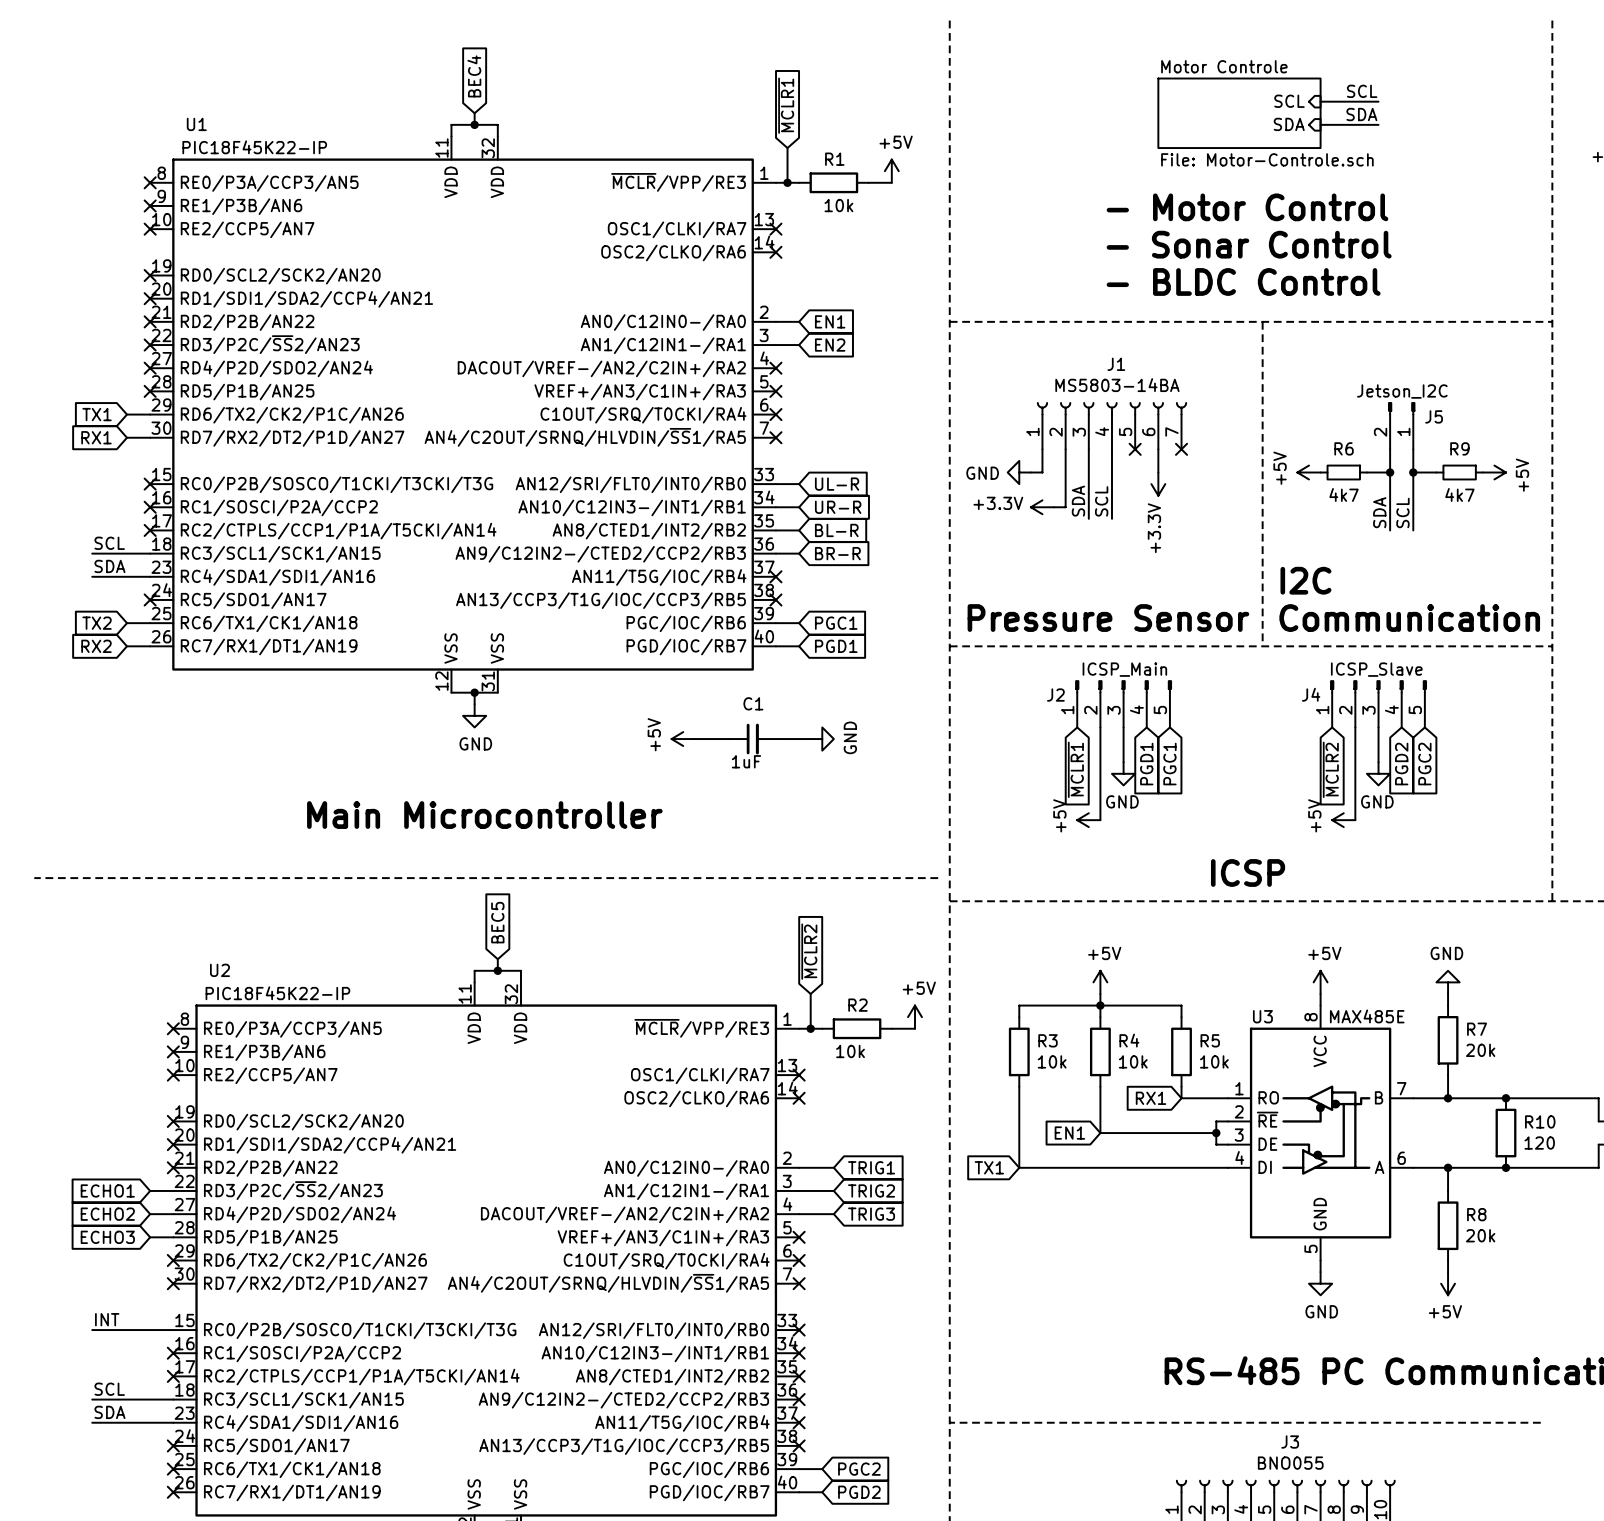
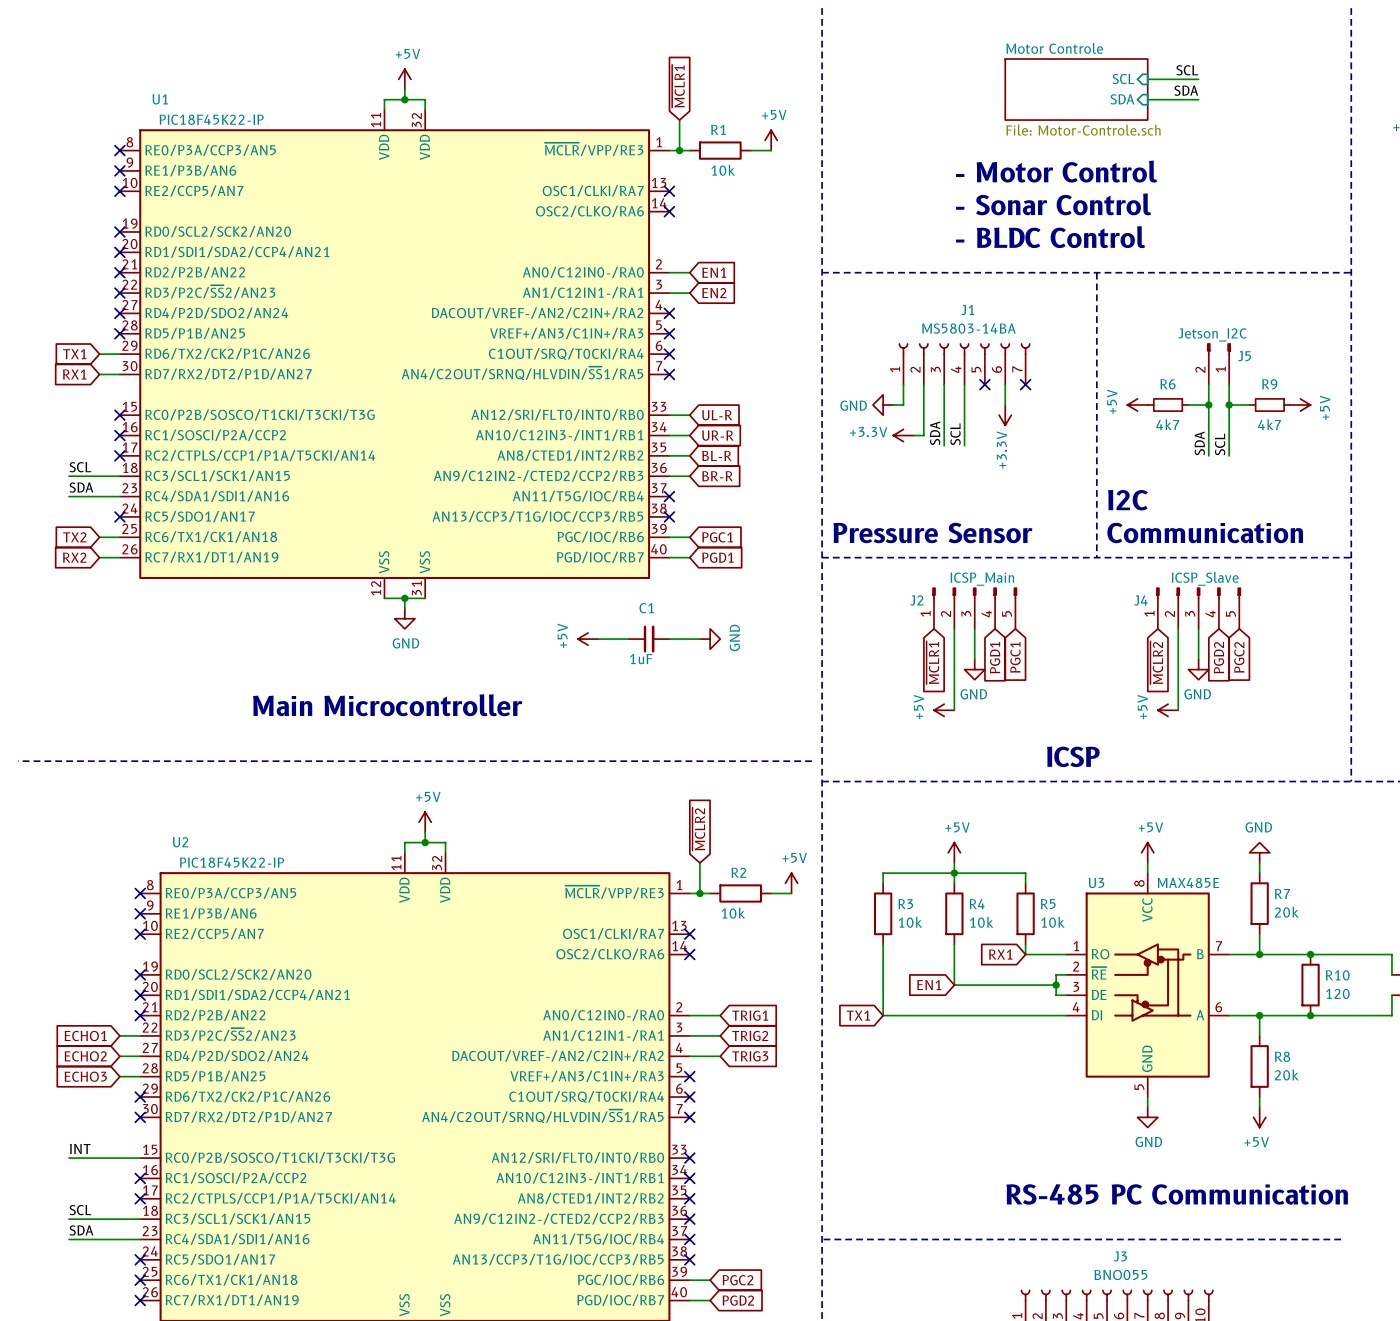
global label: BEC4 (474, 76) -> none
power symbol: none -> +5V (404, 79)
global label: BEC5 (497, 922) -> none
power symbol: none -> +5V (425, 822)

